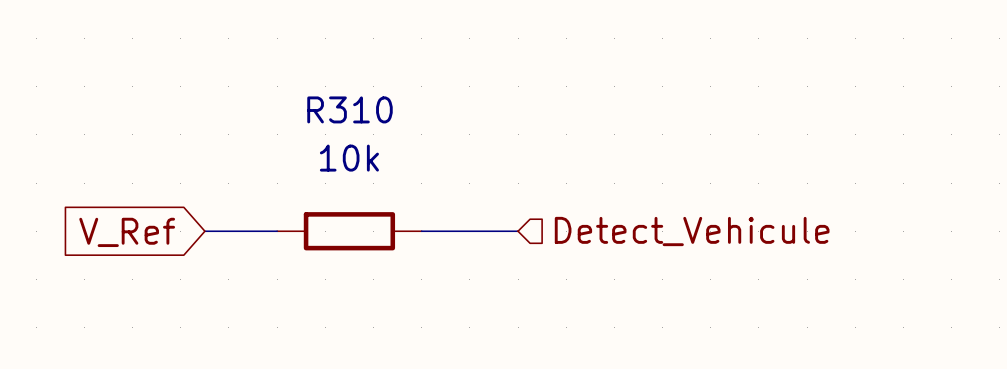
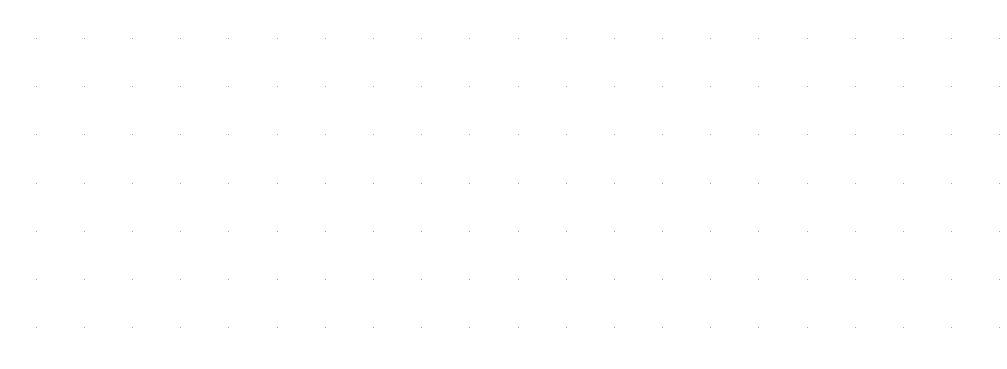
wire: (204, 231) (277, 231) -> none
R310: 10k (349, 231) -> none
wire: (421, 231) (518, 231) -> none
hierarchical label: Detect_Vehicule (692, 231) -> none
global label: V_Ref (127, 232) -> none

